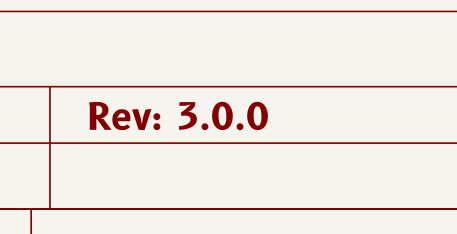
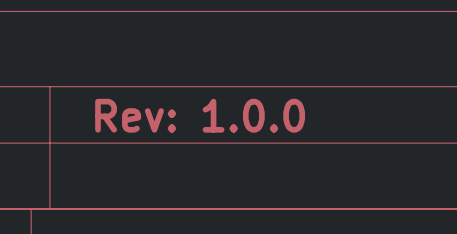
title block: Rev: 3.0.0 (178, 116) -> Rev: 1.0.0 (200, 115)

